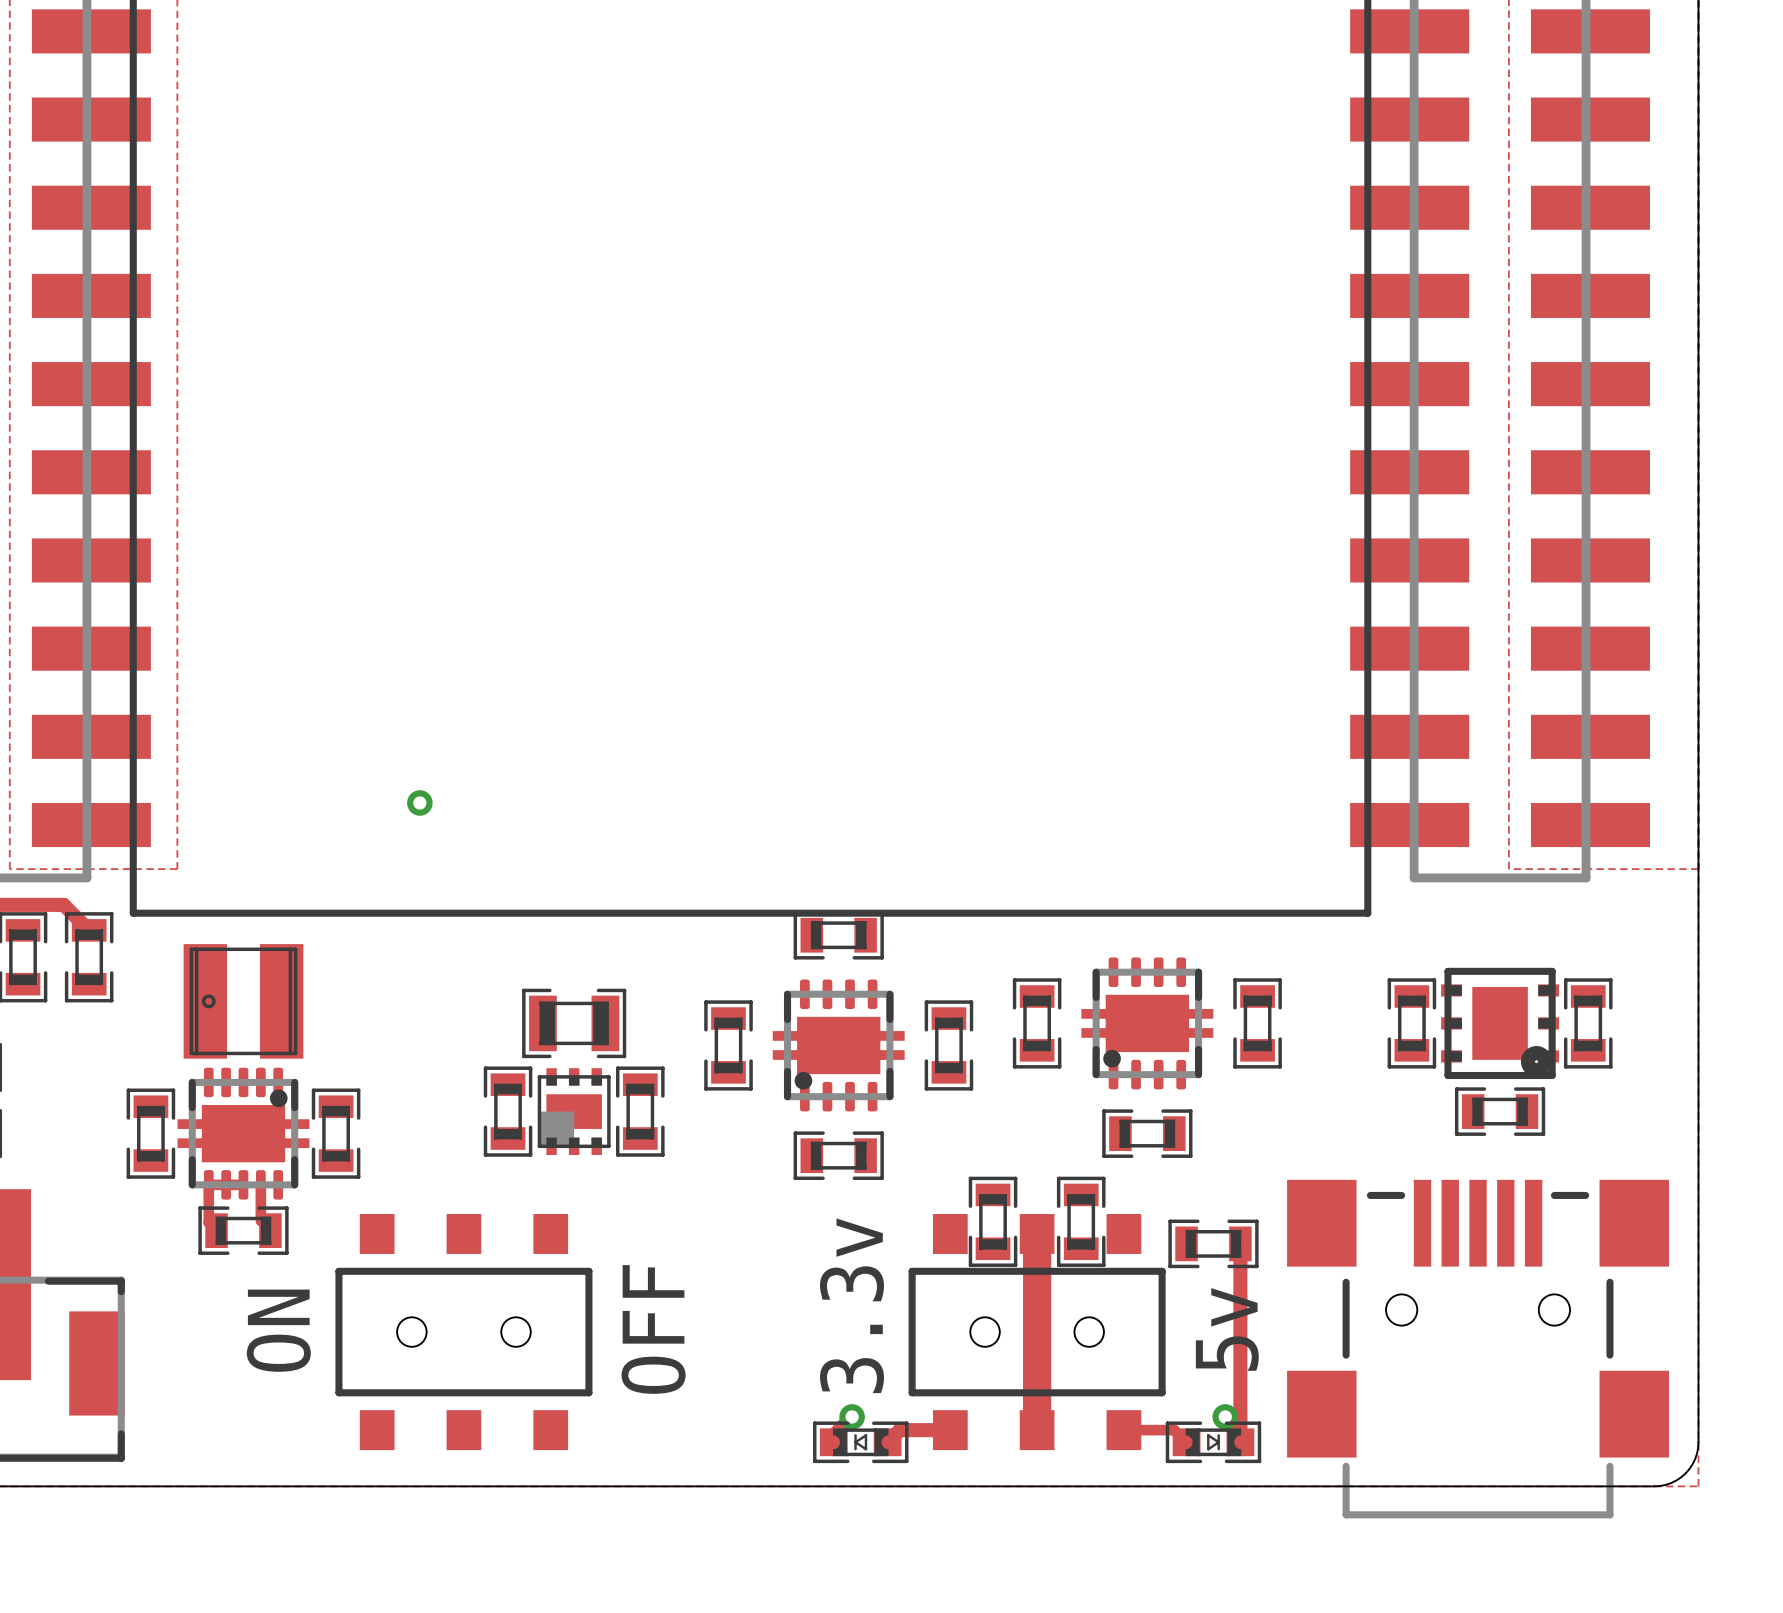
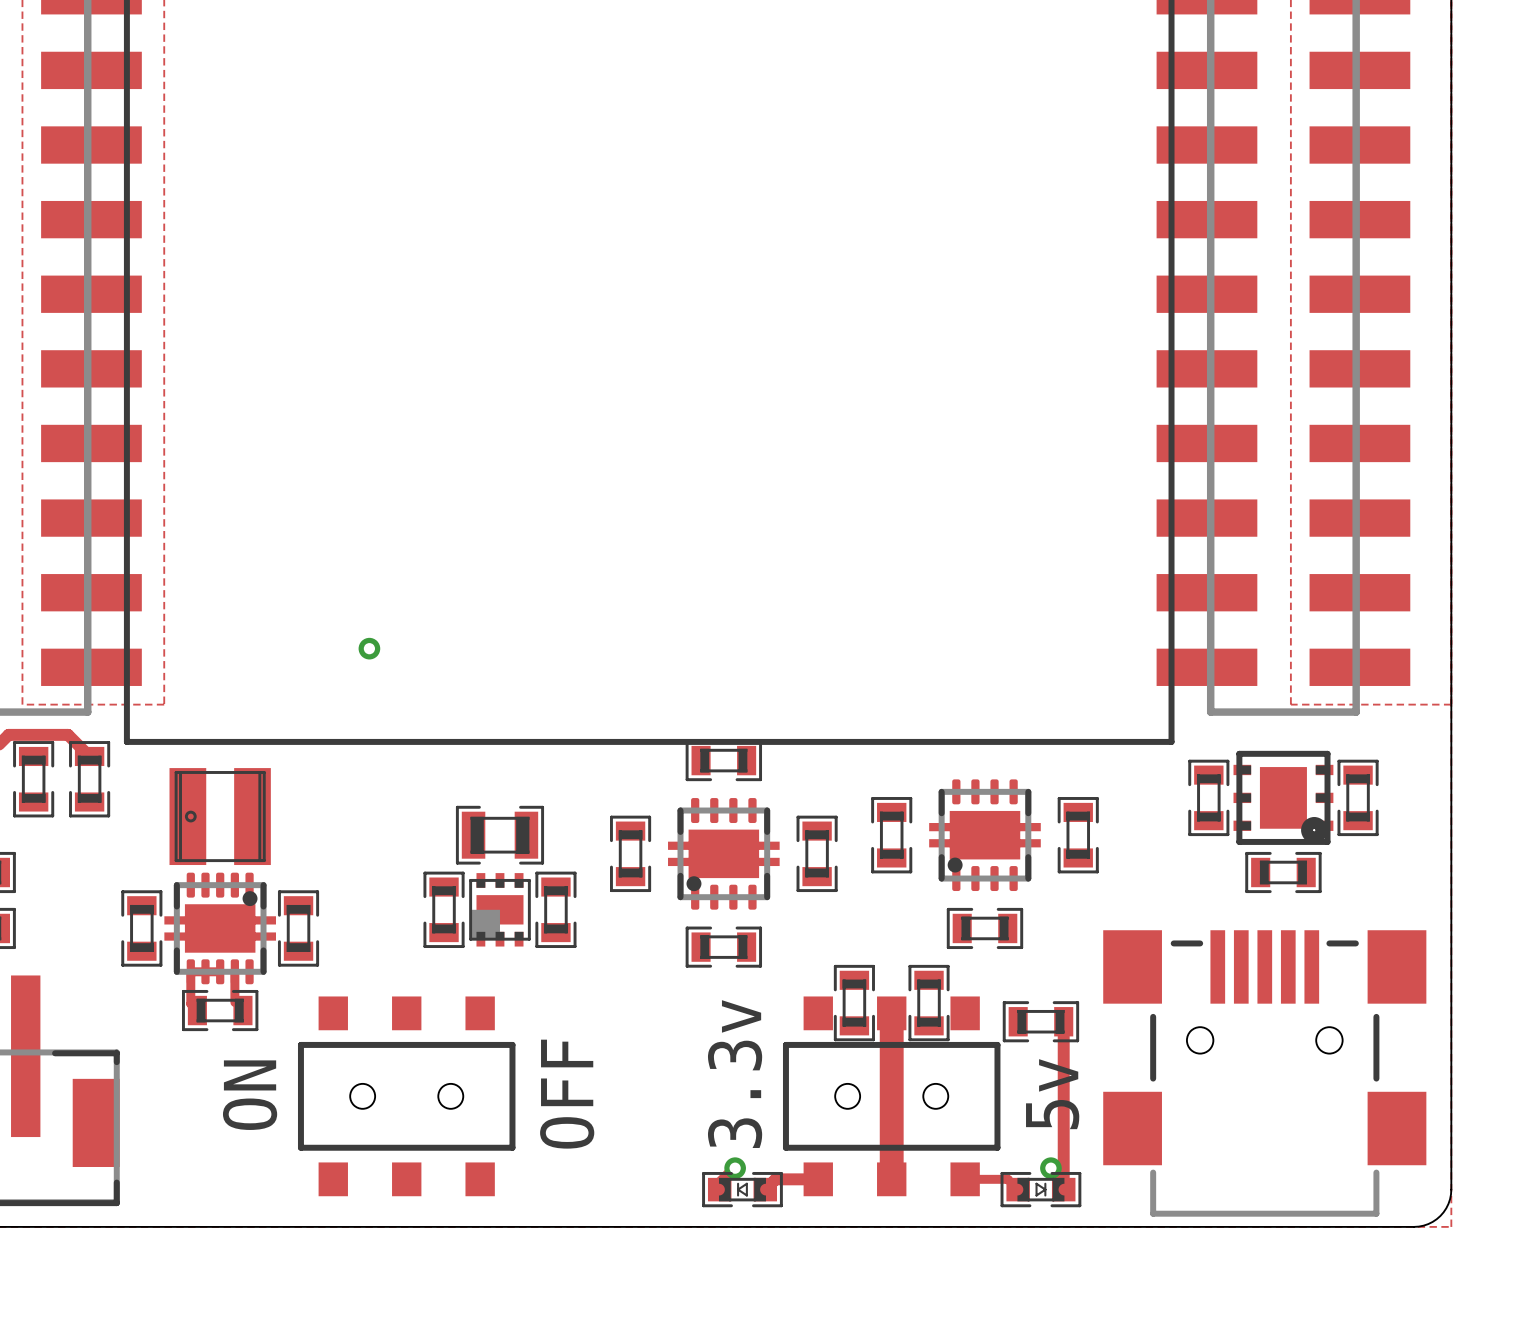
part position: (1411, 1023) -> (1208, 797)
part position: (1500, 1023) -> (1283, 797)
part position: (1588, 1023) -> (1358, 797)
part position: (1500, 1111) -> (1283, 872)
part position: (1478, 1349) -> (1264, 1073)

